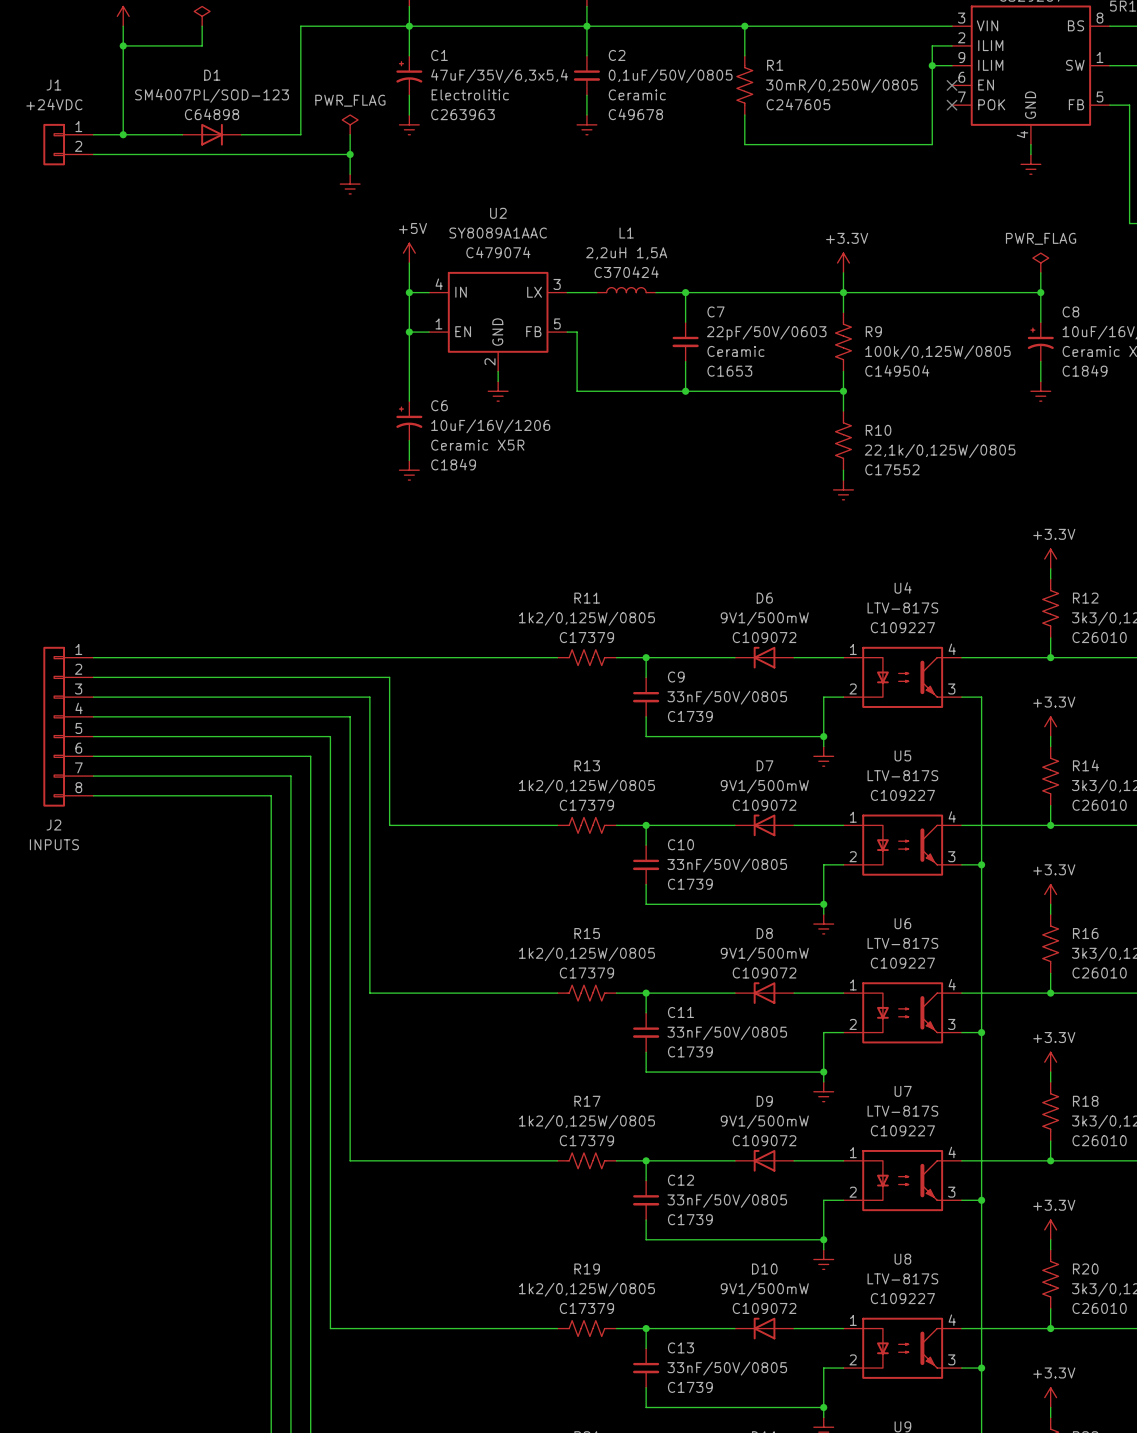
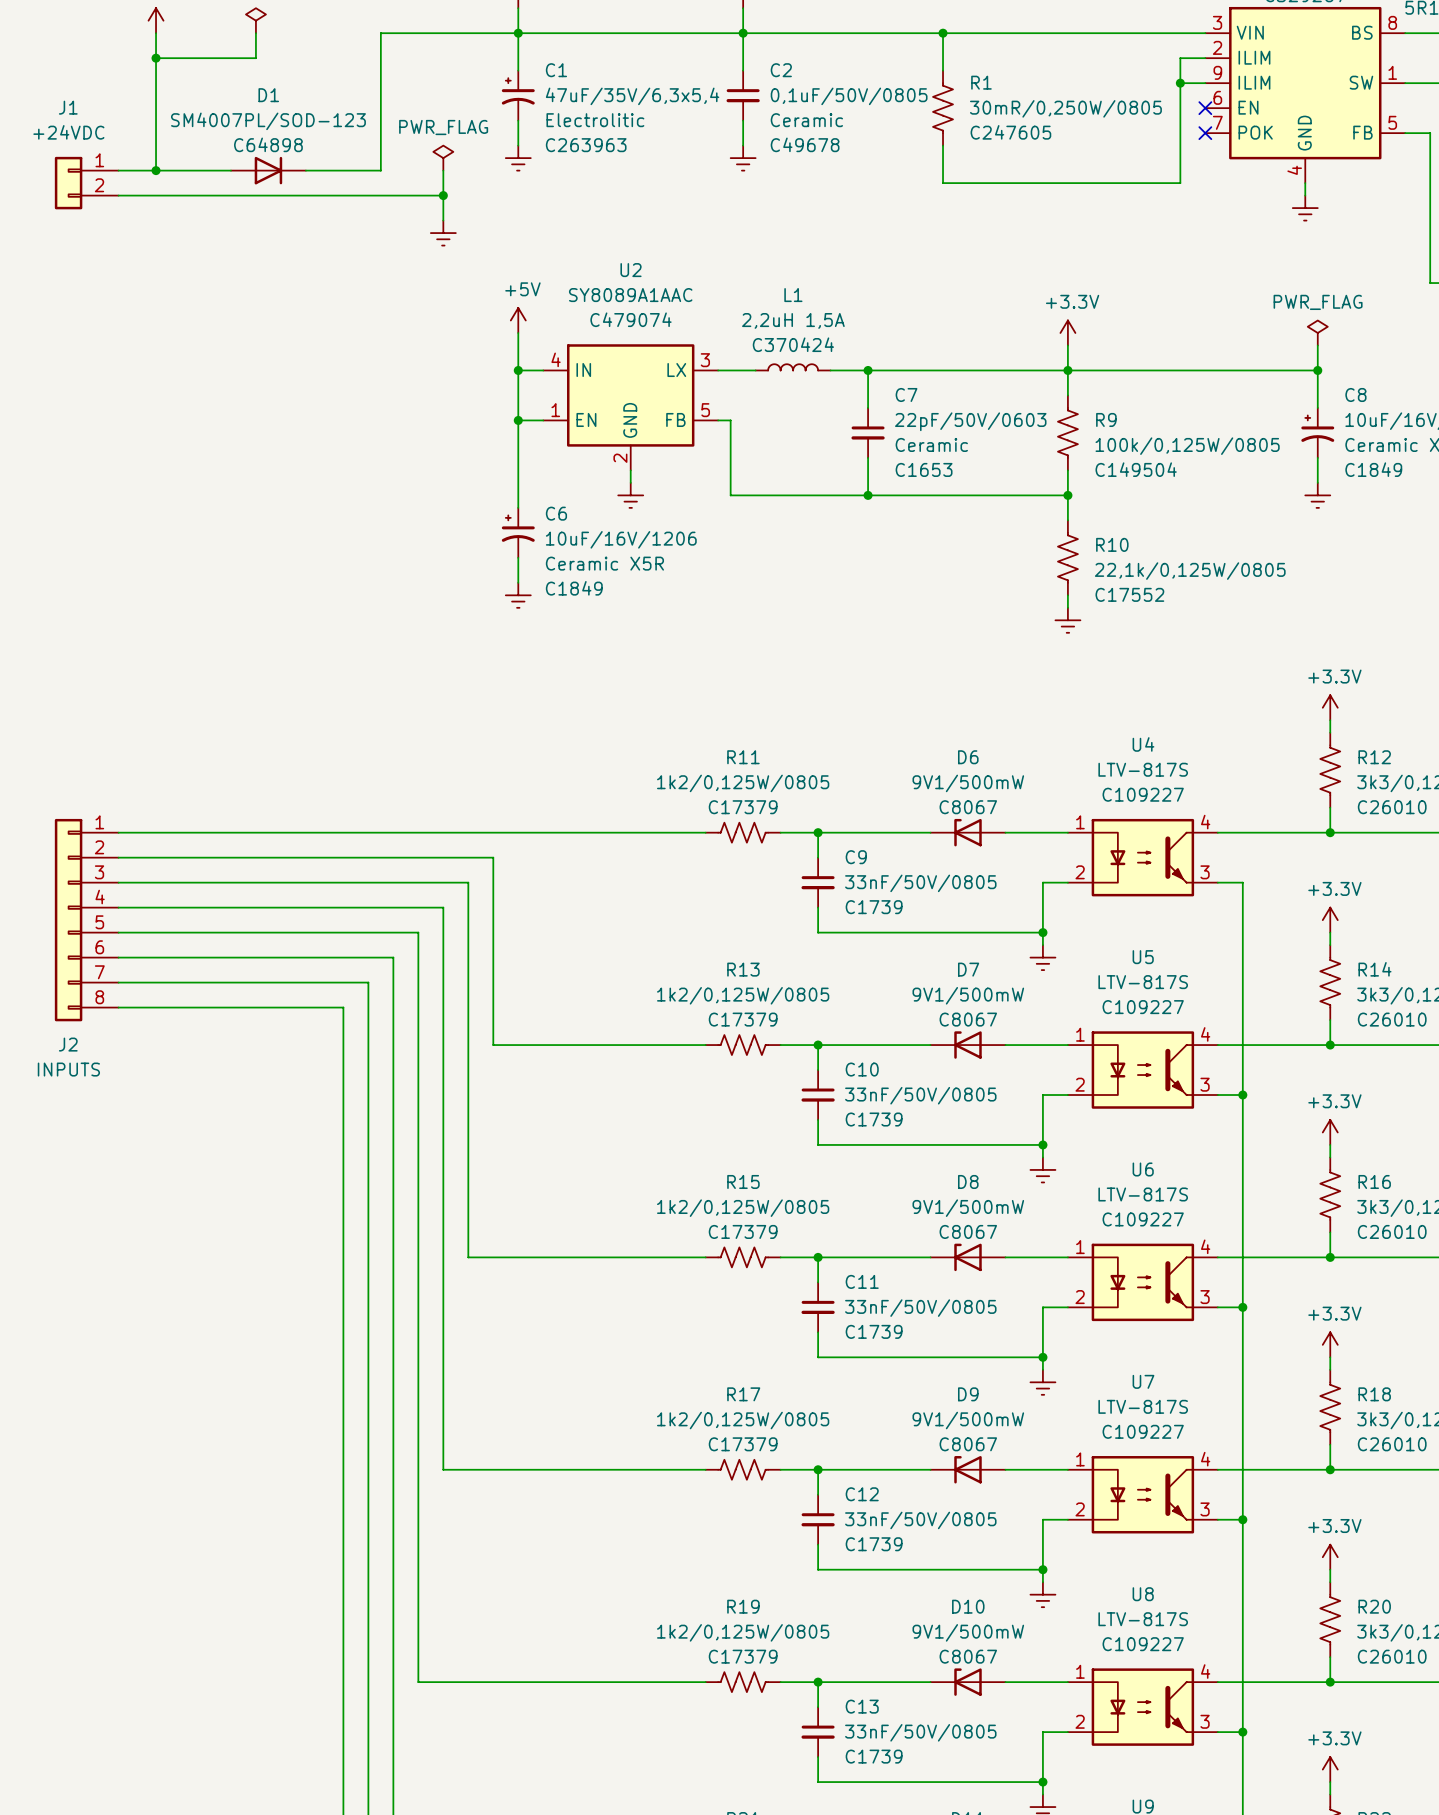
D6 text: C109072 (764, 637) -> C8067 (968, 807)
D7 text: C109072 (764, 805) -> C8067 (968, 1019)
D8 text: C109072 (764, 973) -> C8067 (968, 1231)
D9 text: C109072 (764, 1140) -> C8067 (968, 1444)
D10 text: C109072 (764, 1308) -> C8067 (968, 1656)

